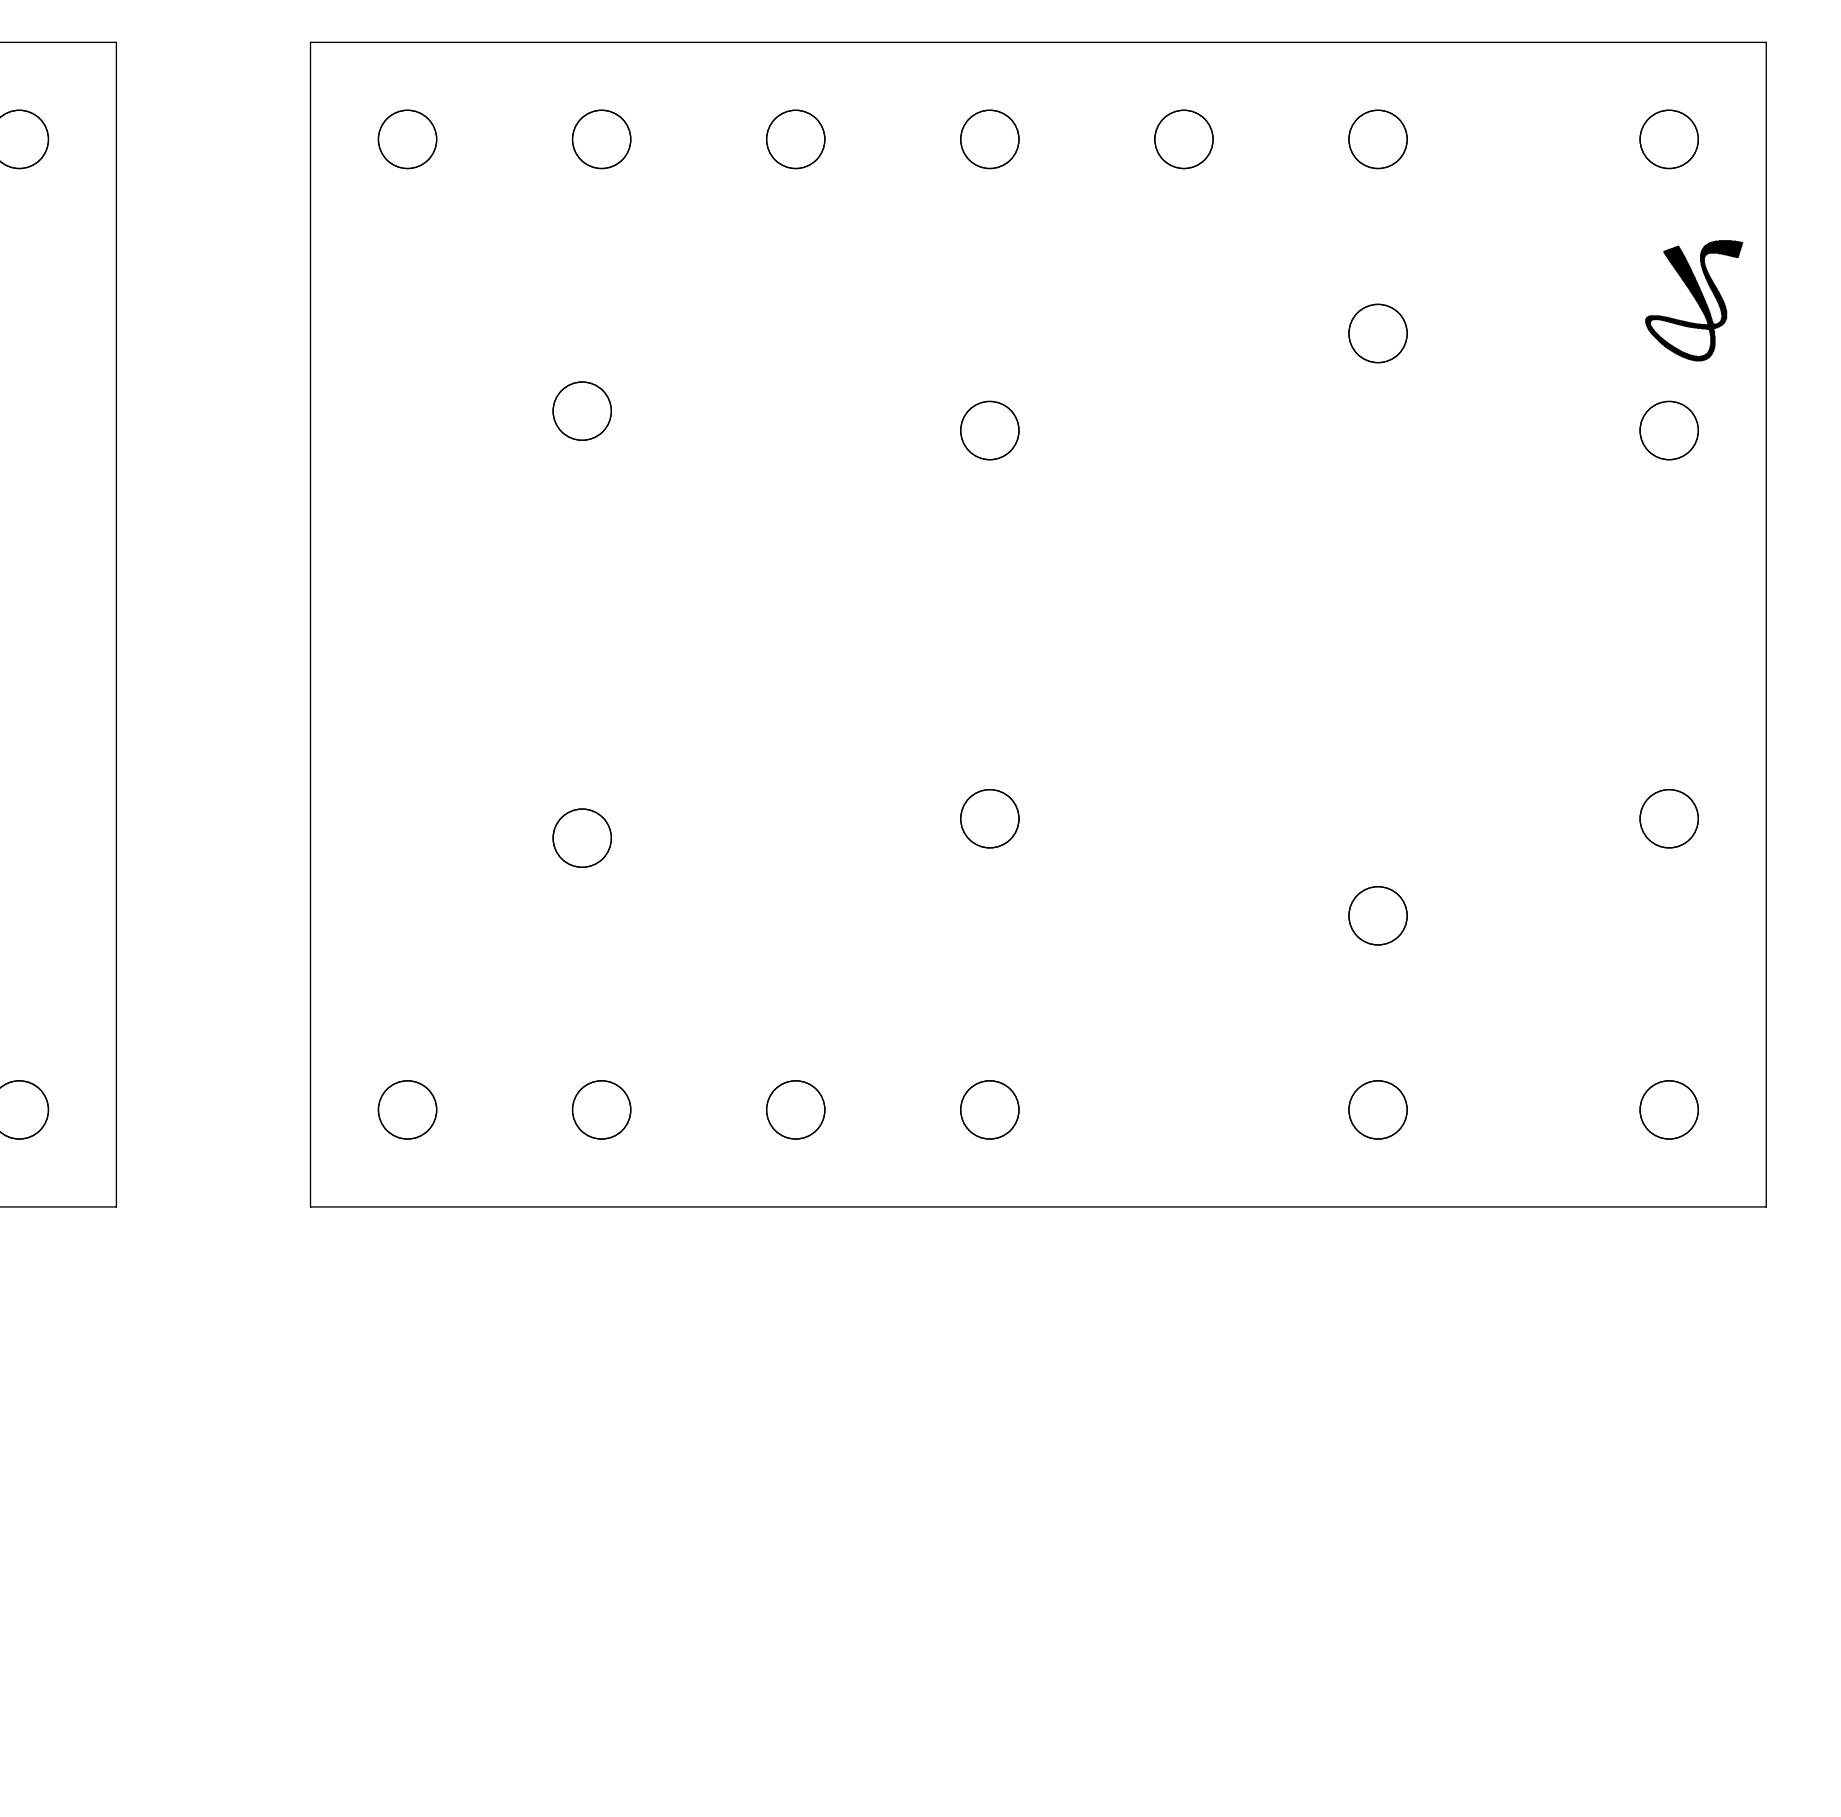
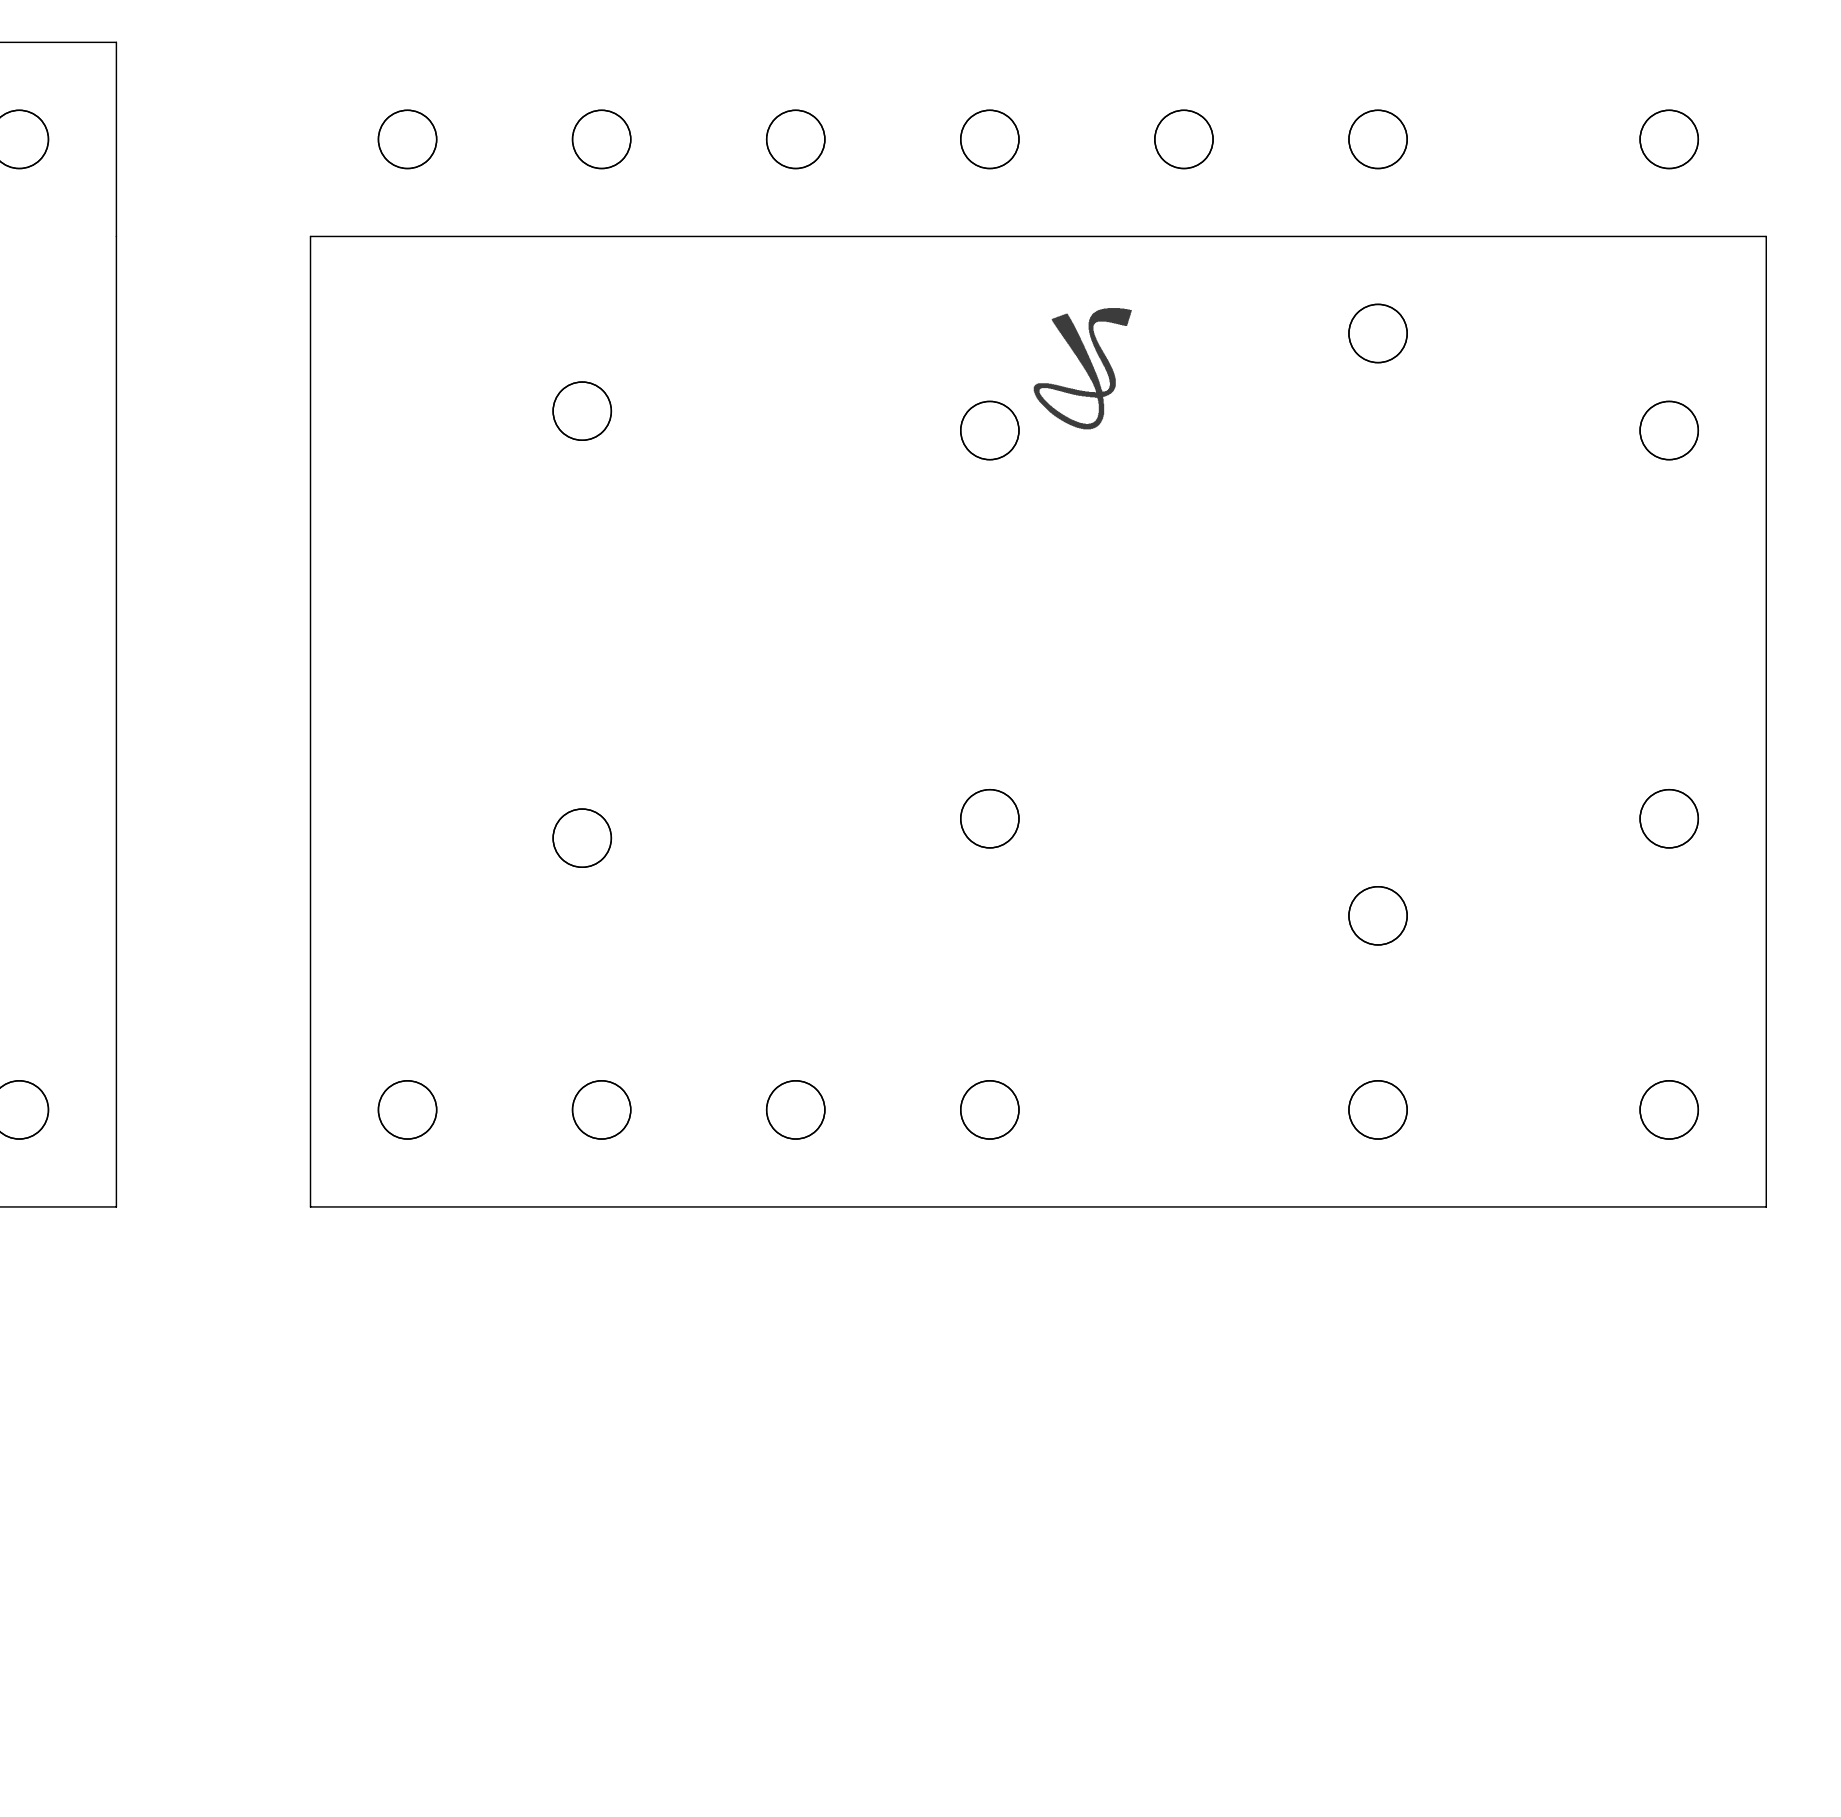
board edge: (310, 236) (310, 42) (1766, 42) (1766, 236) -> (310, 236) (1766, 236)
drawing: [1645, 240, 1744, 362] -> none
drawing: none -> [1033, 308, 1132, 430]

